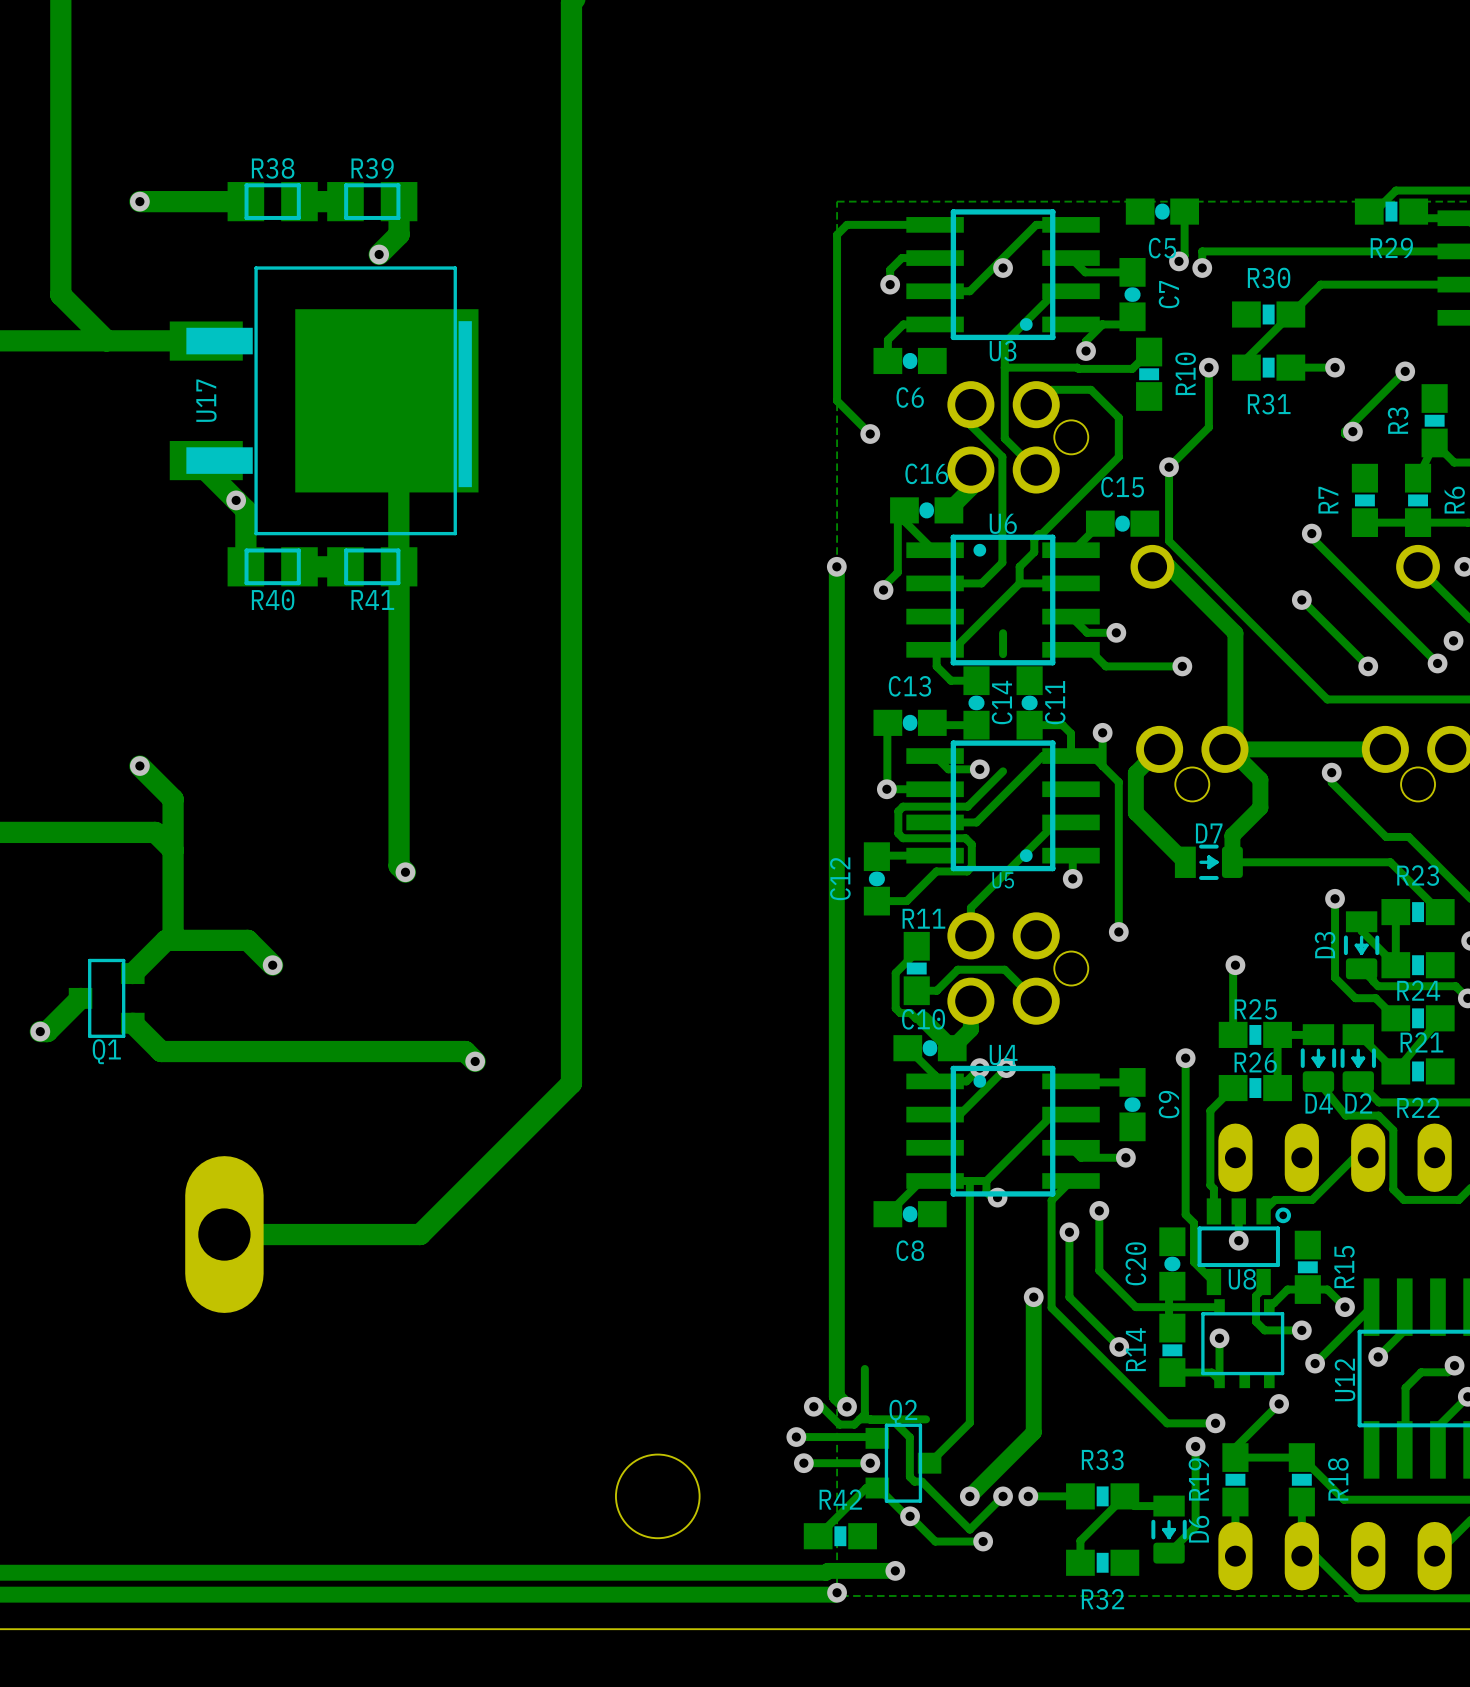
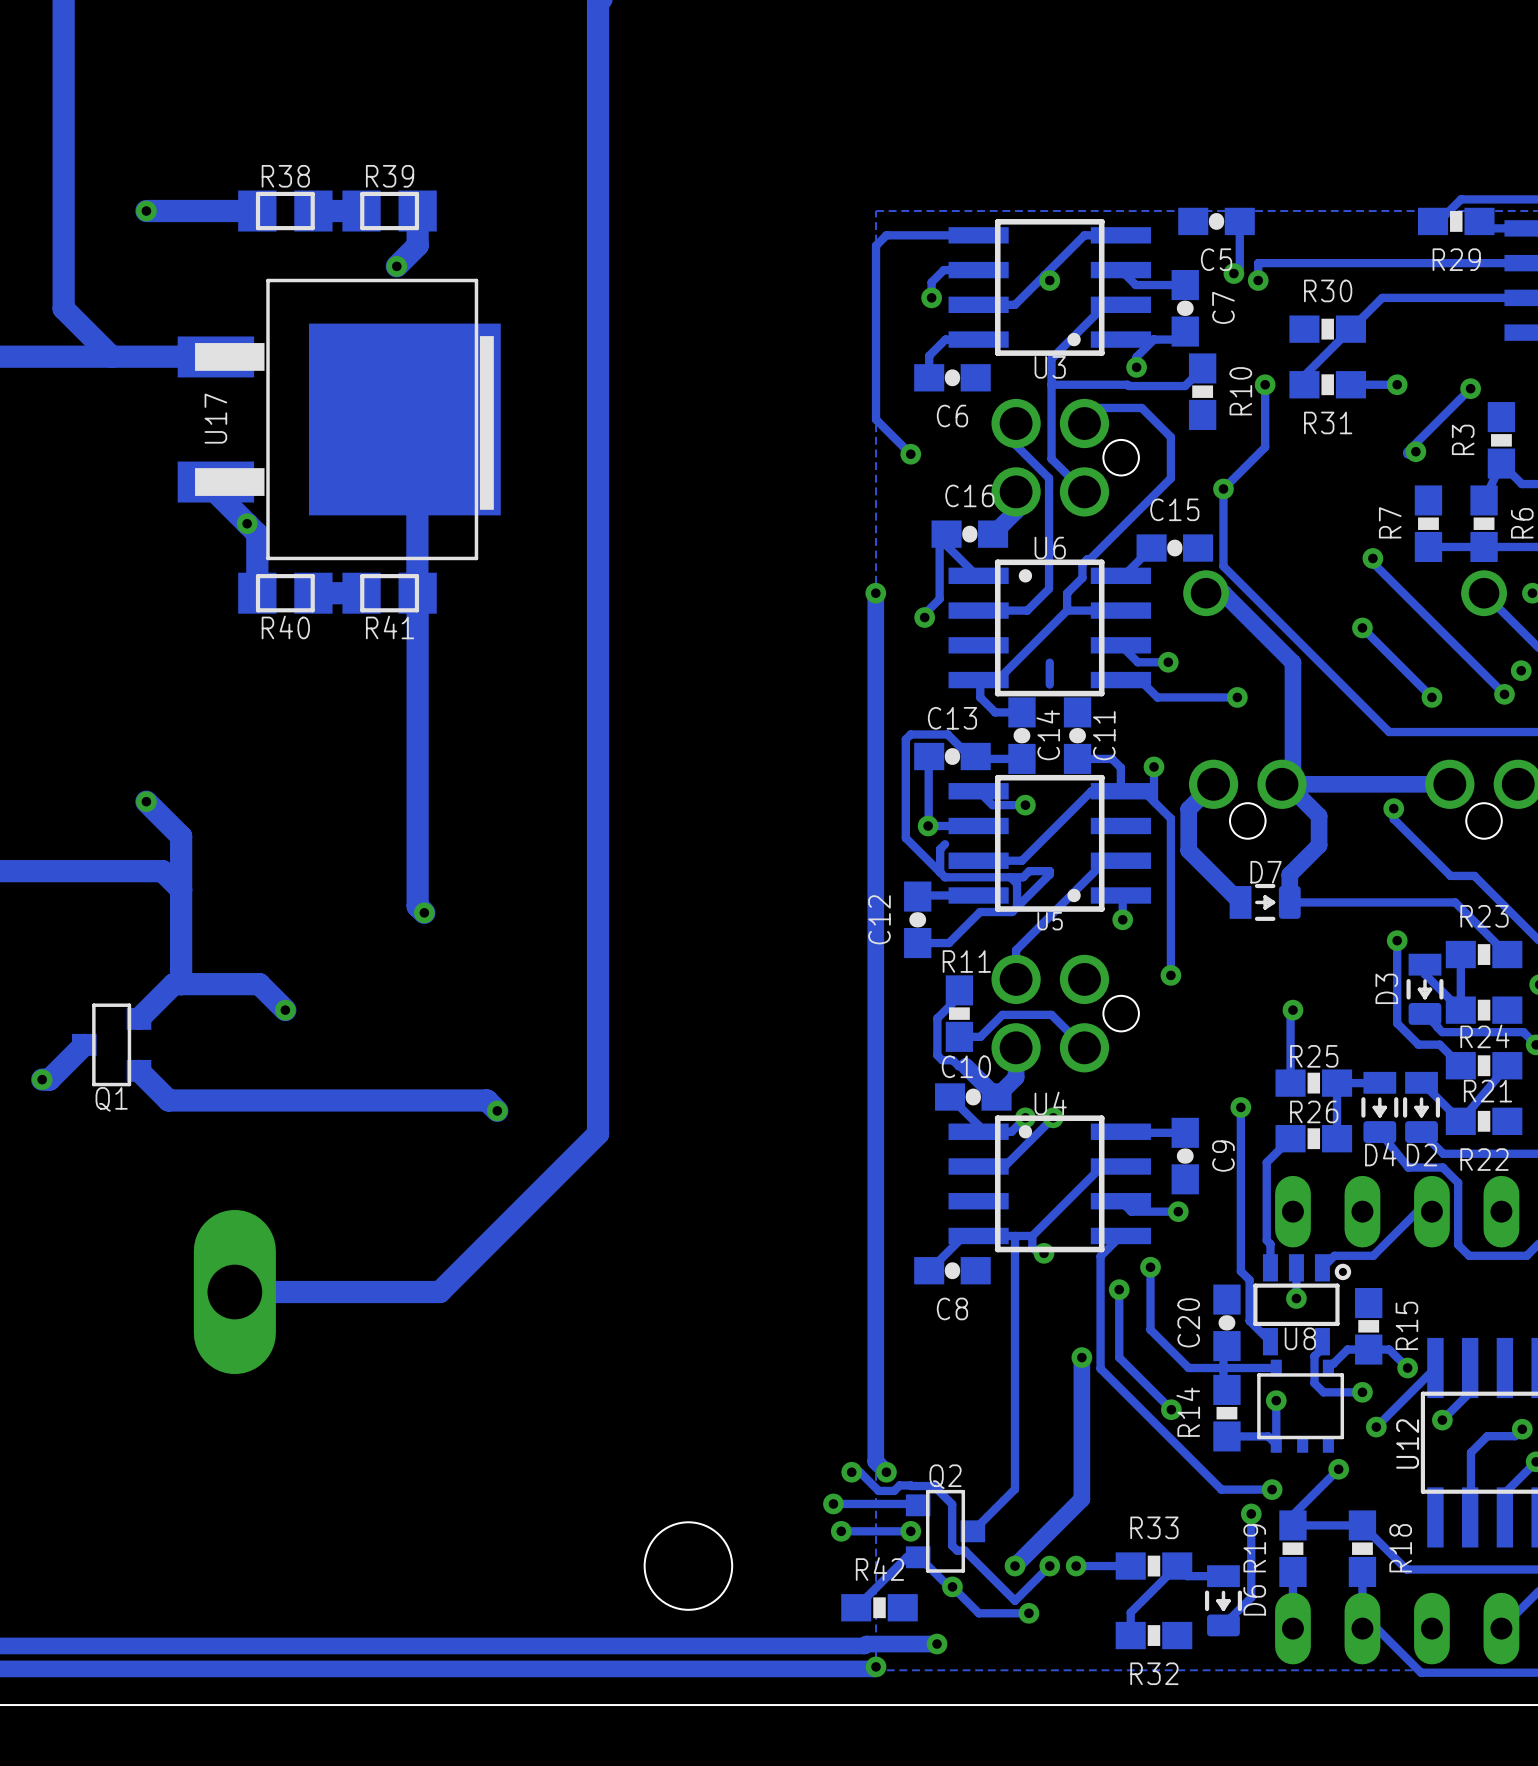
track: none -> (975, 756) (969, 756) (947, 734) (910, 734) (905, 739) (905, 838) (940, 872)
track: (1003, 771) (967, 806) (903, 806) -> none
track: none -> (1010, 877) (1023, 877) (1029, 871) (1049, 871) (1049, 874) (1017, 907)
track: (864, 1368) (864, 1414) (859, 1419) -> none
track: (926, 1419) (870, 1419) -> none

